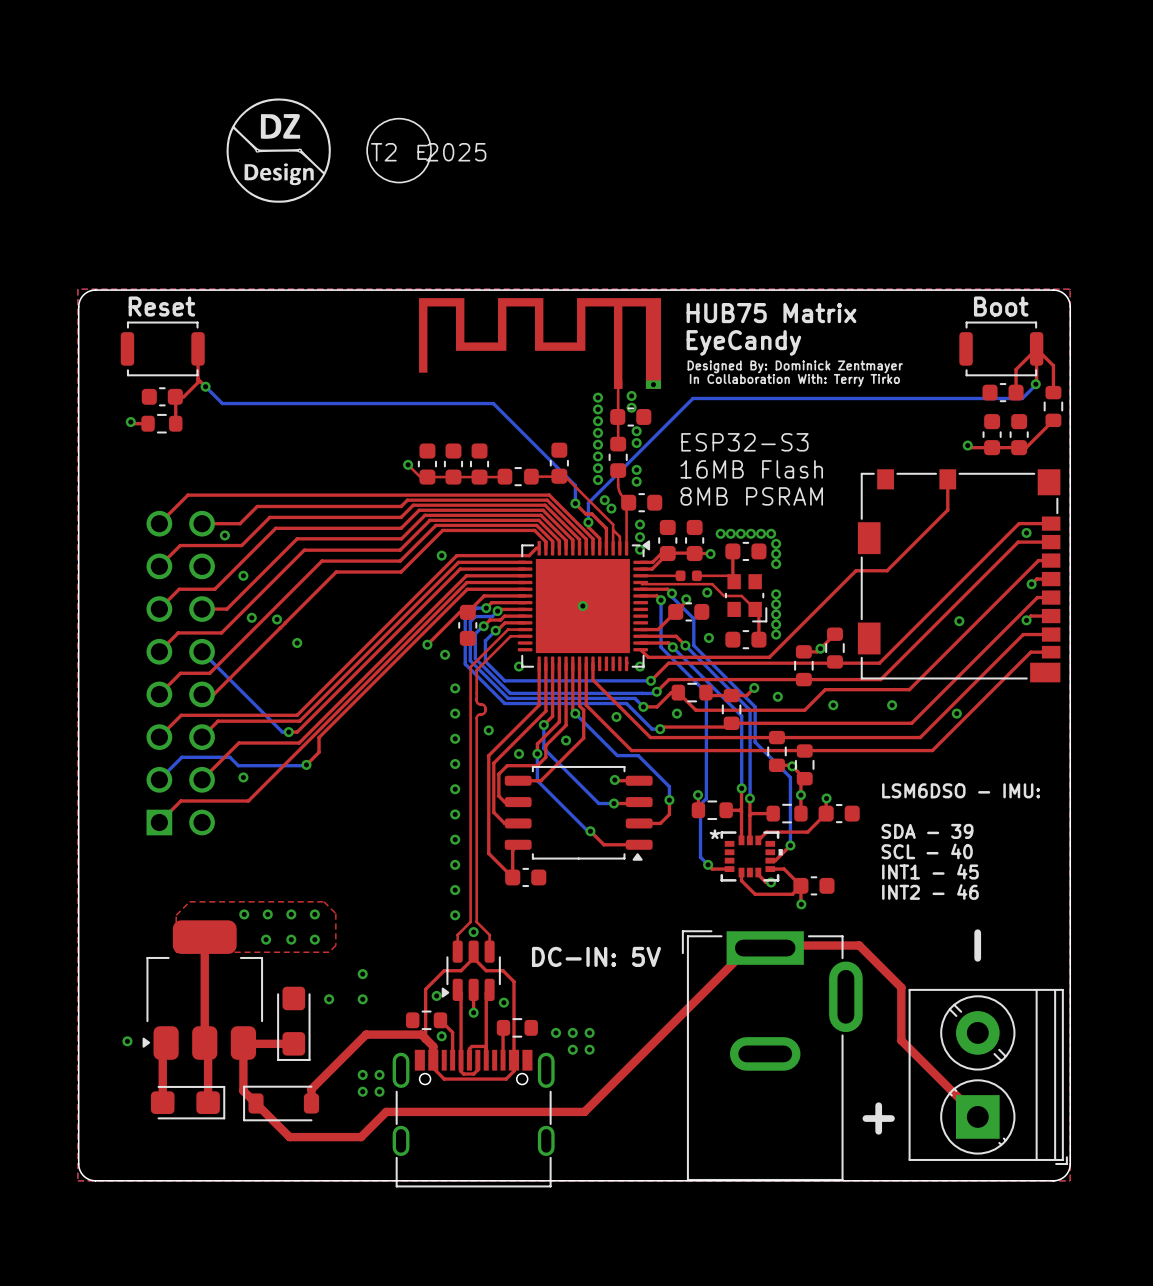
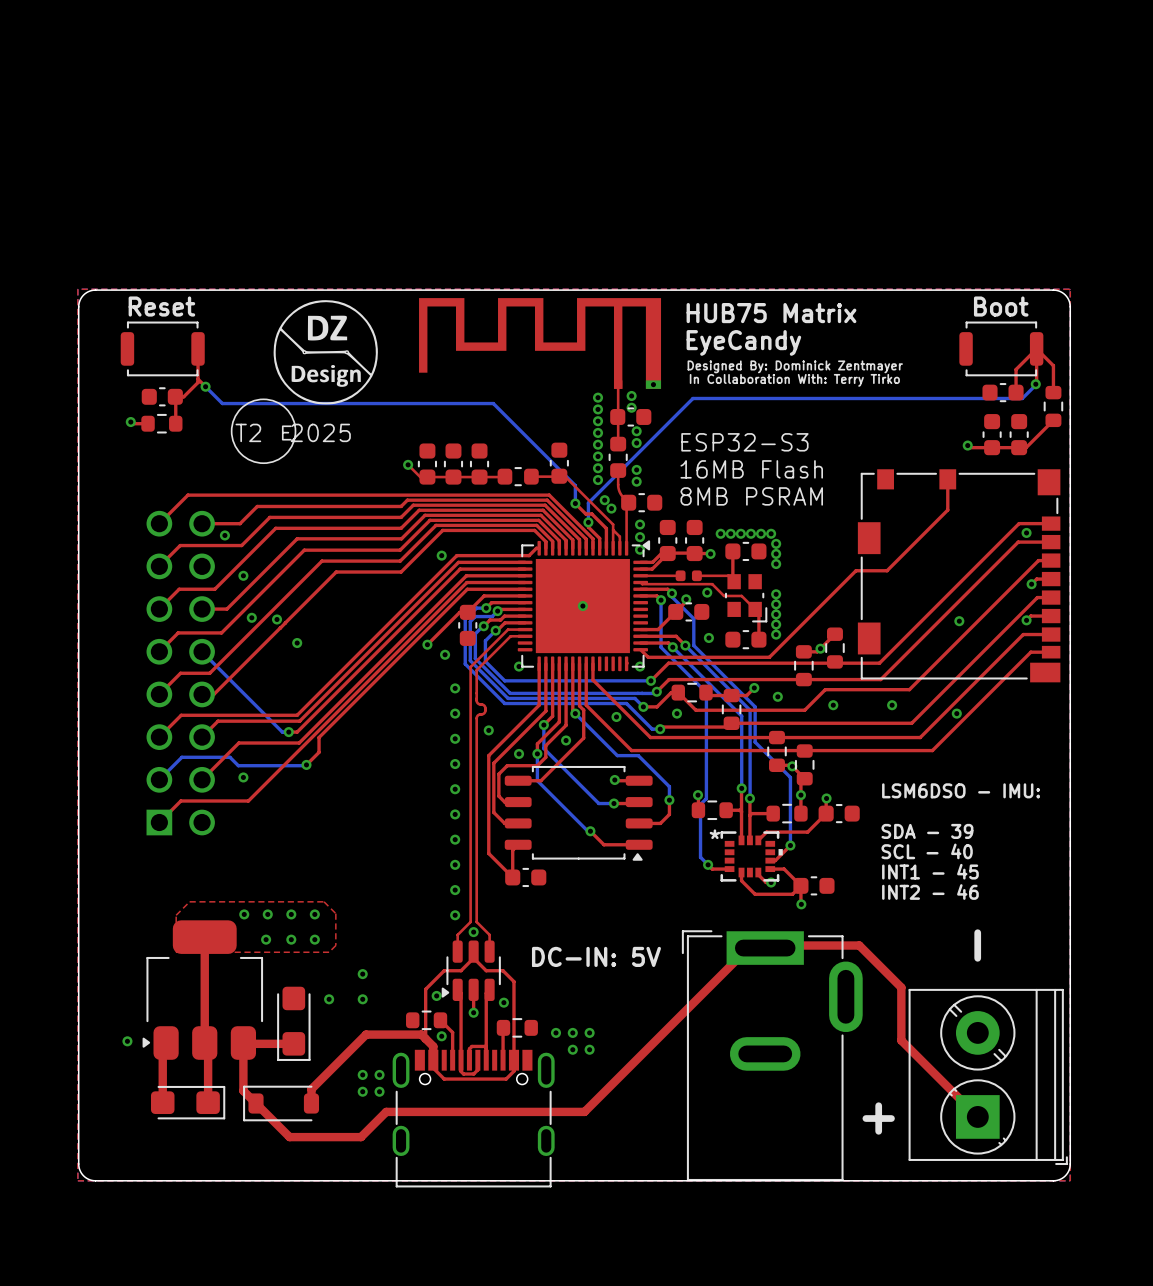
drawing position: (278, 150) -> (325, 352)
drawing position: (399, 150) -> (263, 431)
text position: E (422, 152) -> E (286, 432)
text position: T2 2025 (428, 152) -> T2 2025 (293, 432)

